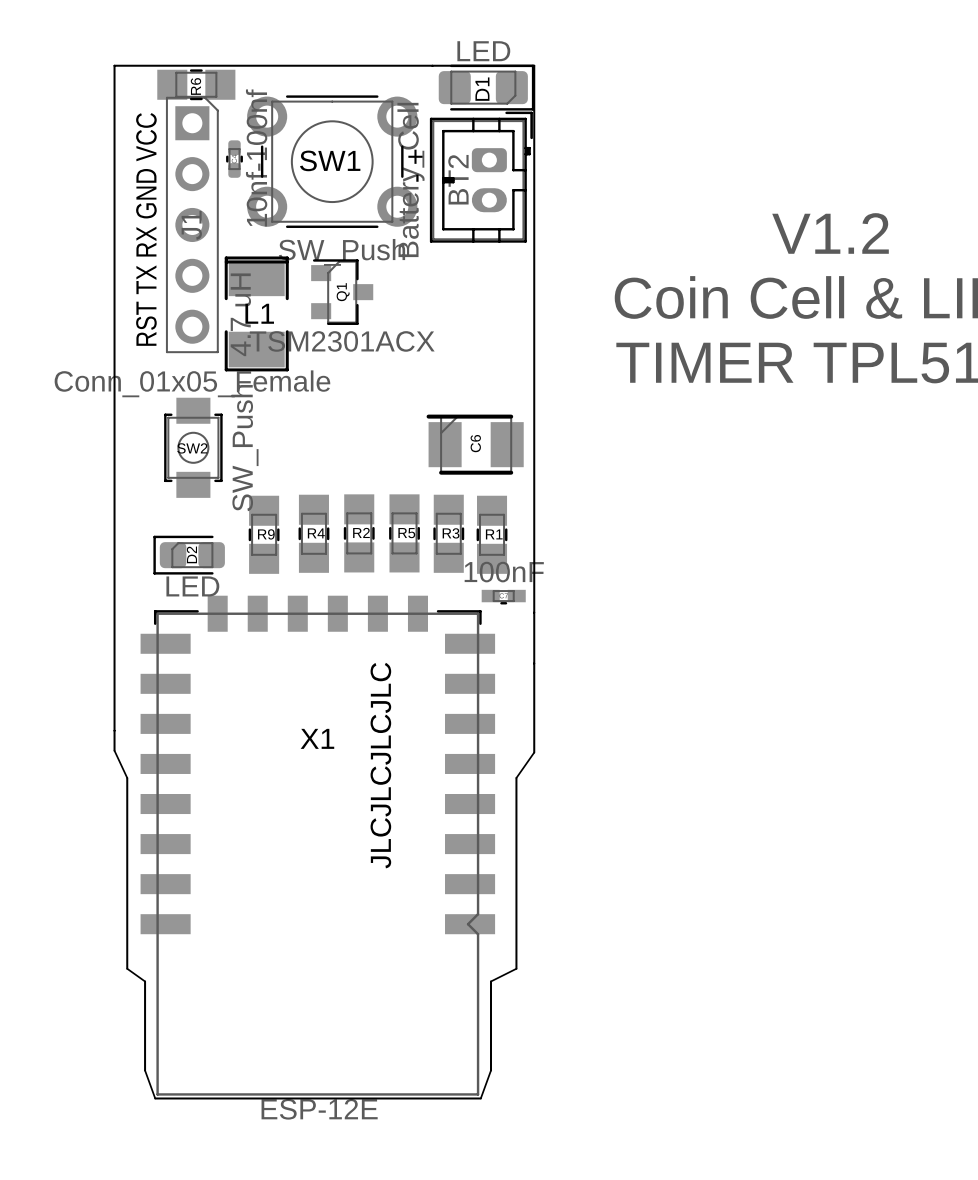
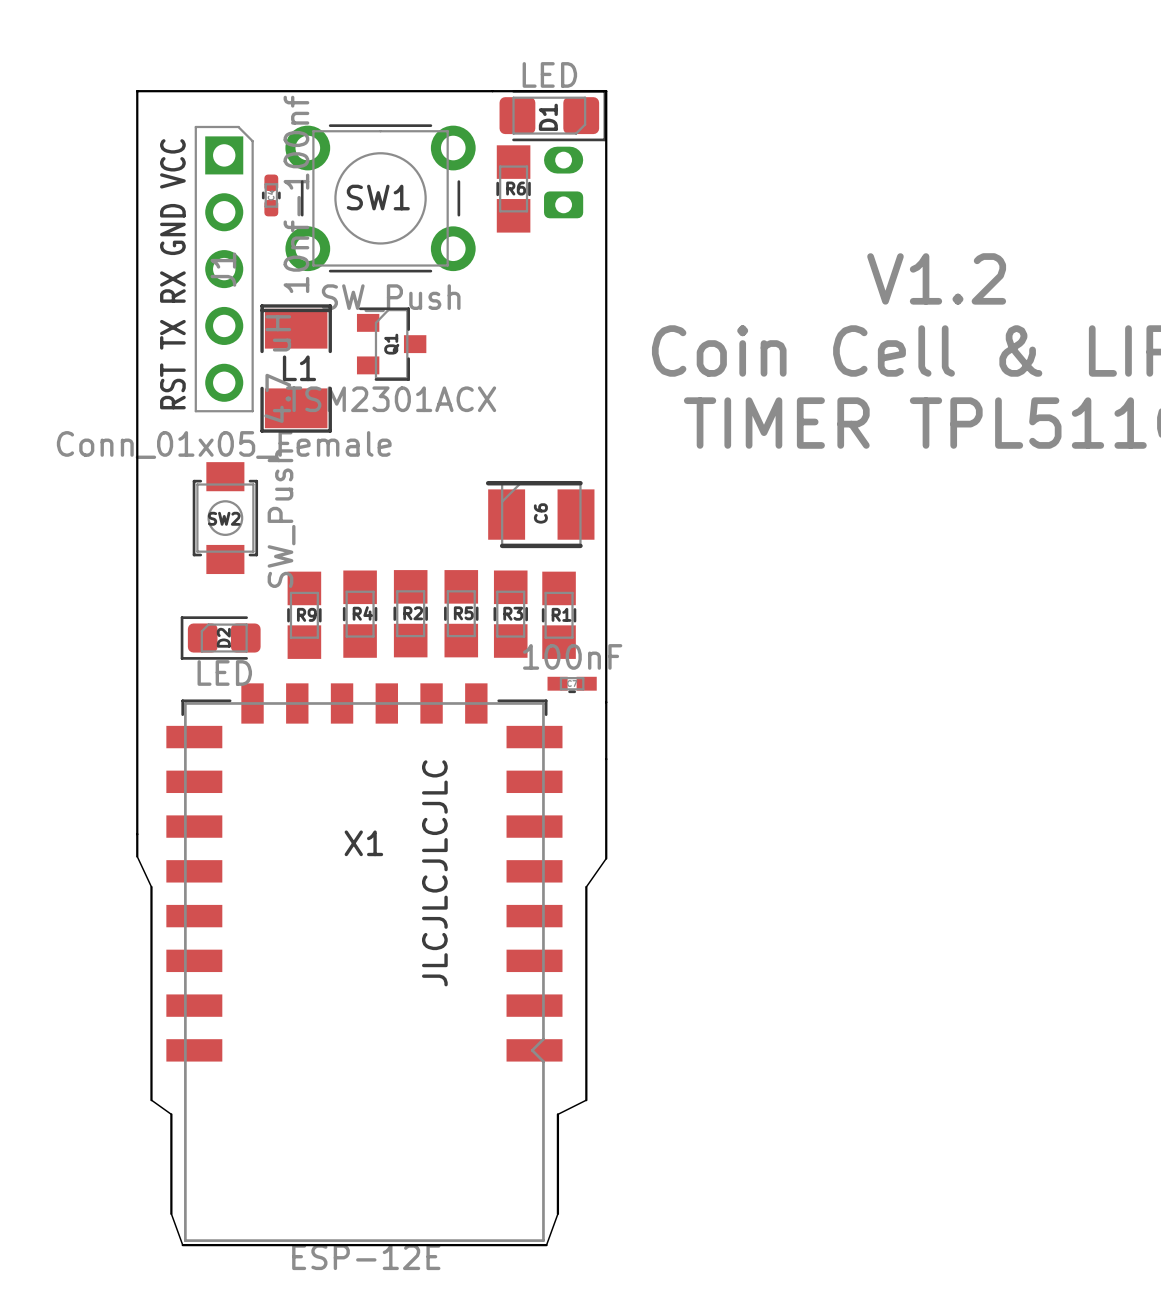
R6 rotation: 0° (196, 84) -> 90° clockwise (513, 188)
R6 position: (196, 84) -> (513, 188)
text: - + (415, 165) -> none
BT2 side: top (481, 177) -> bottom (563, 182)

